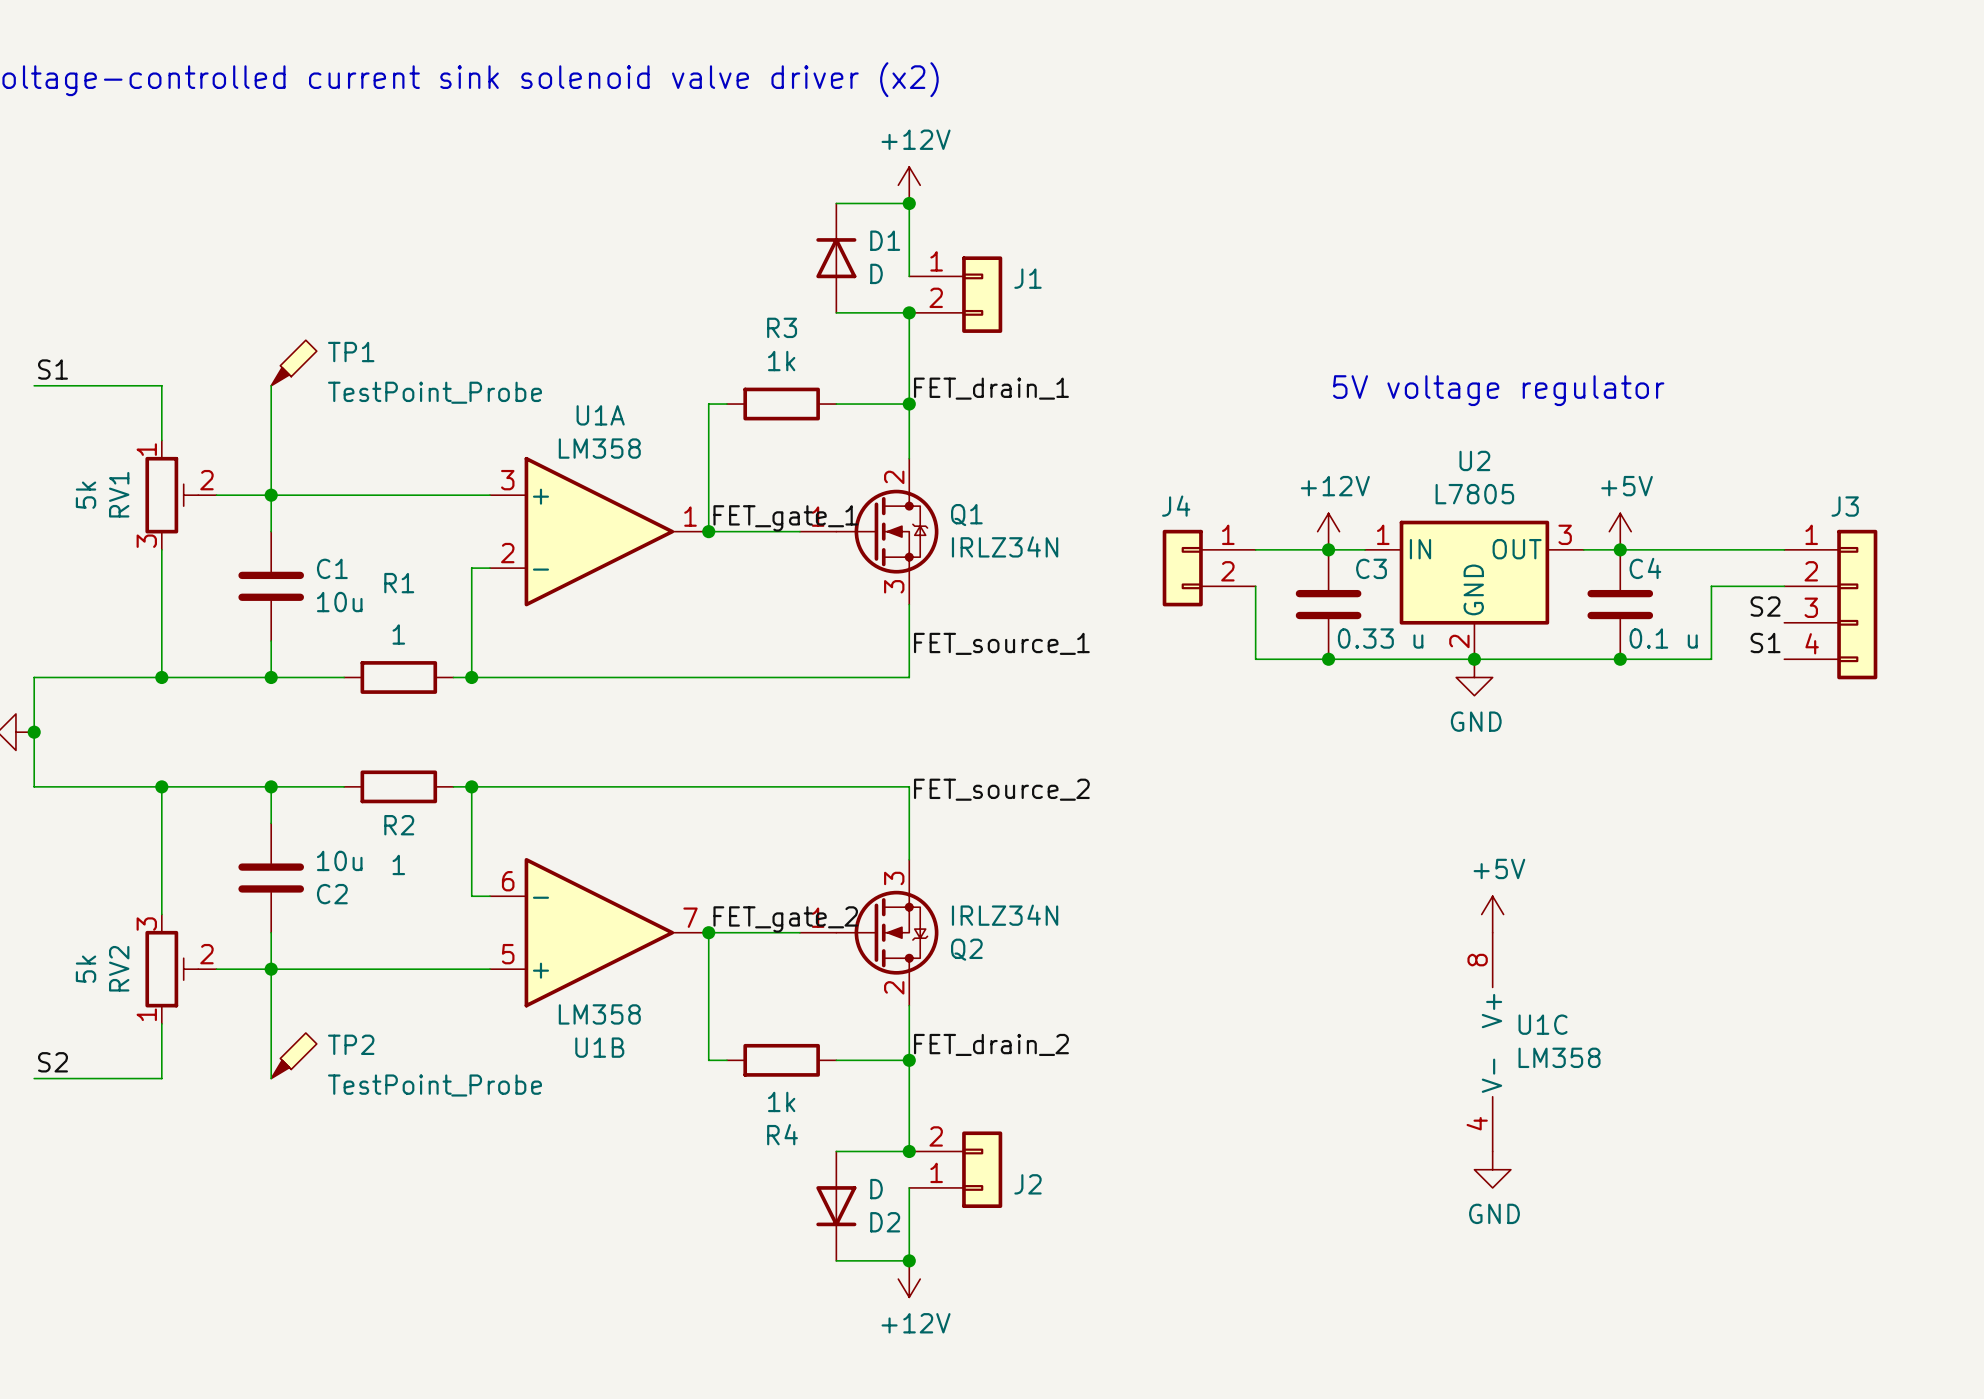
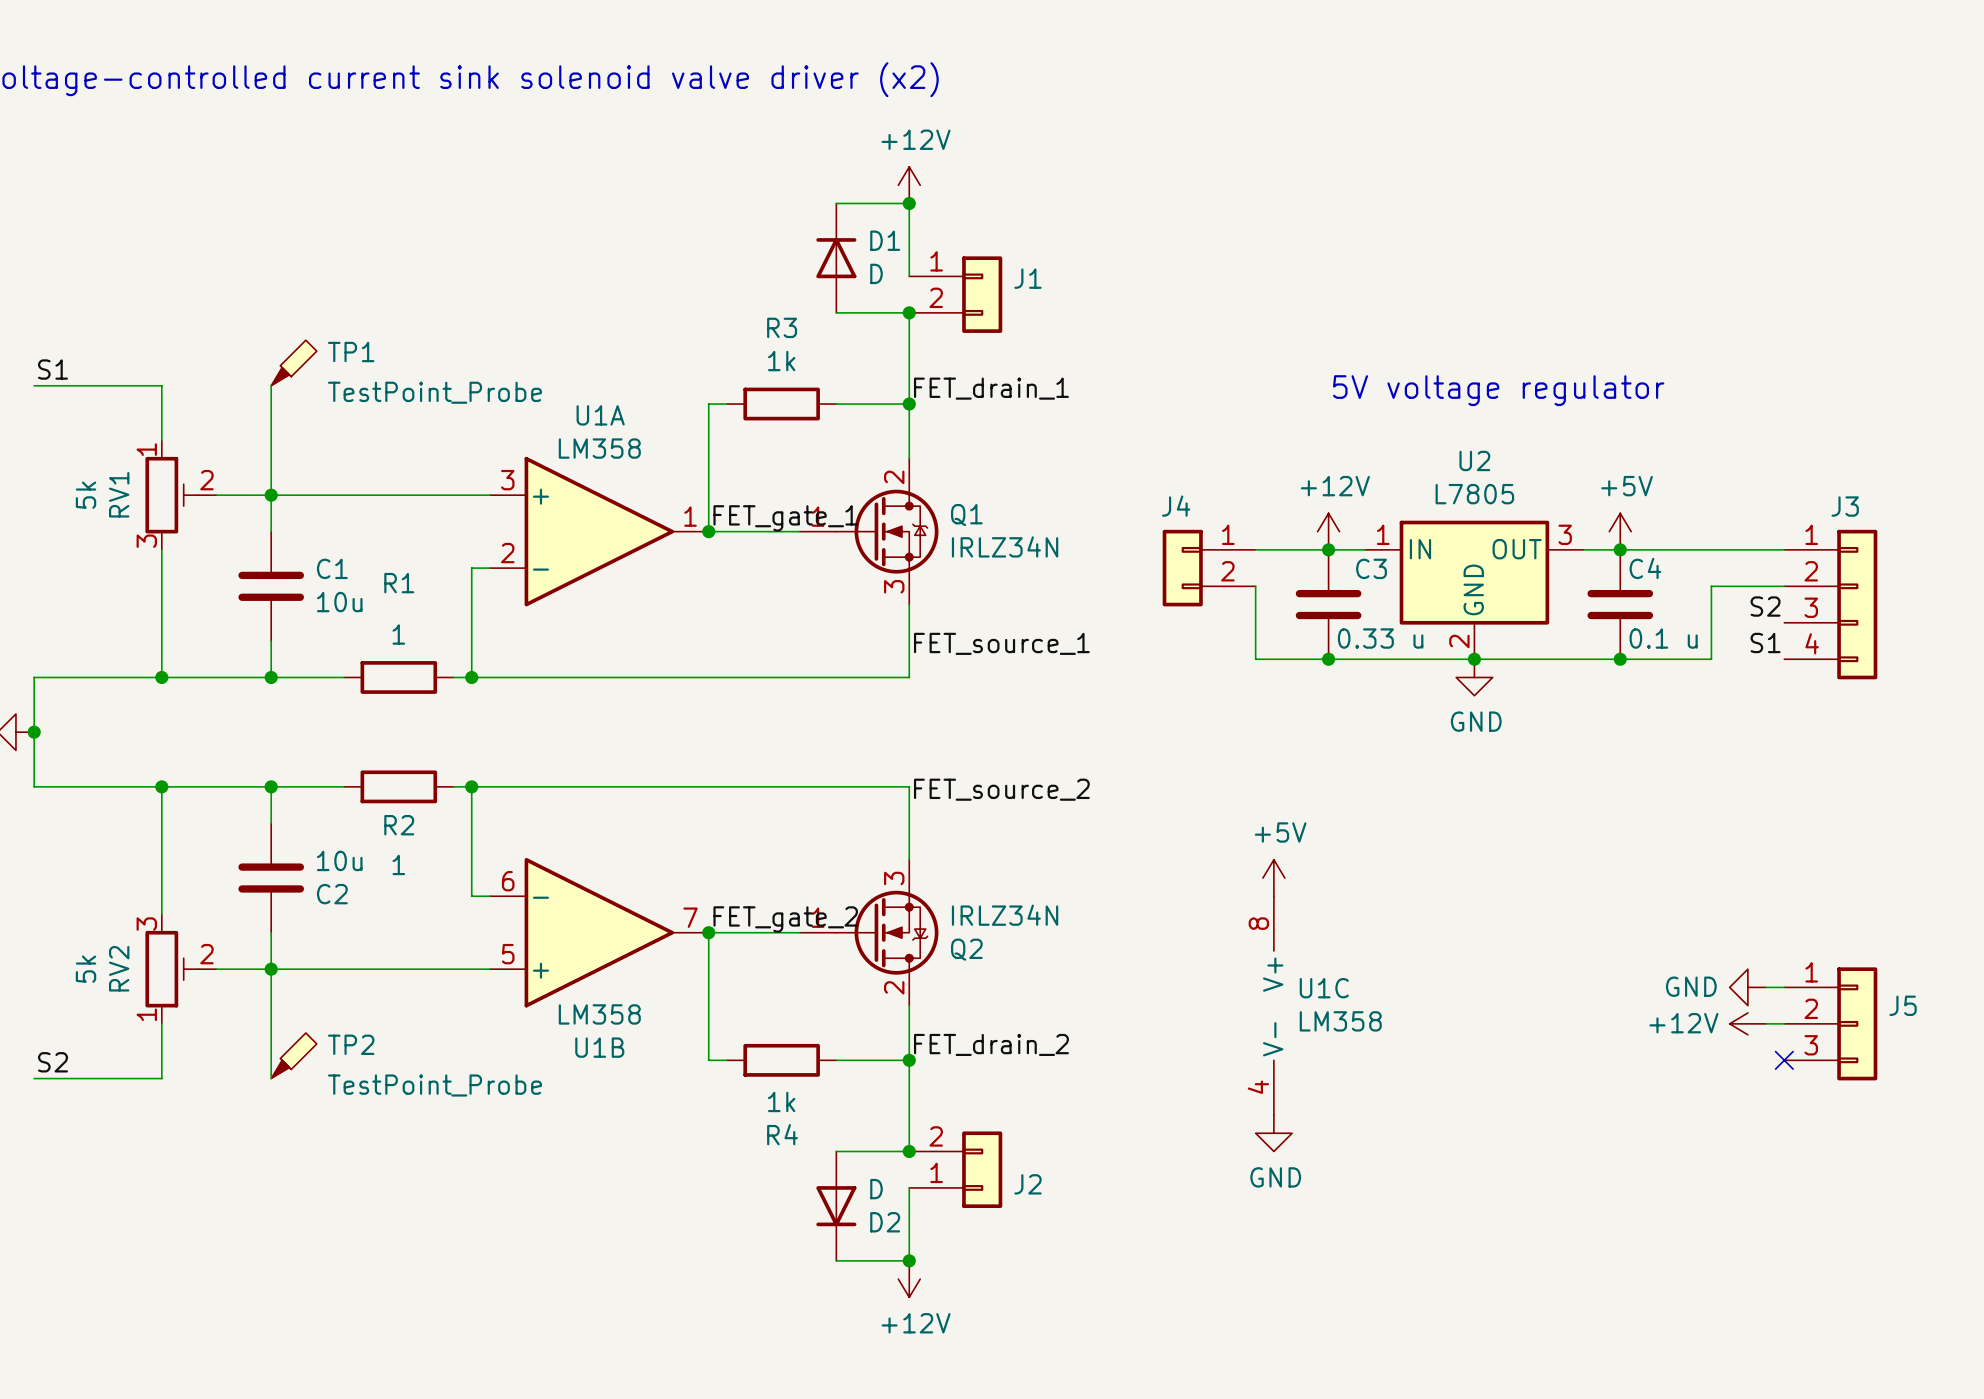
power symbol position: +5V (1492, 914) -> +5V (1273, 878)
power symbol: none -> GND (1747, 987)
wire: none -> (1766, 987) (1784, 987)
power symbol: none -> +12V (1747, 1023)
wire: none -> (1766, 1023) (1784, 1023)
J5: none -> (1830, 1023)
U1C position: (1492, 1042) -> (1273, 1005)
no-connect mark: none -> (1784, 1060)
power symbol: none -> GND (1273, 1133)
power symbol: GND (1492, 1169) -> none

